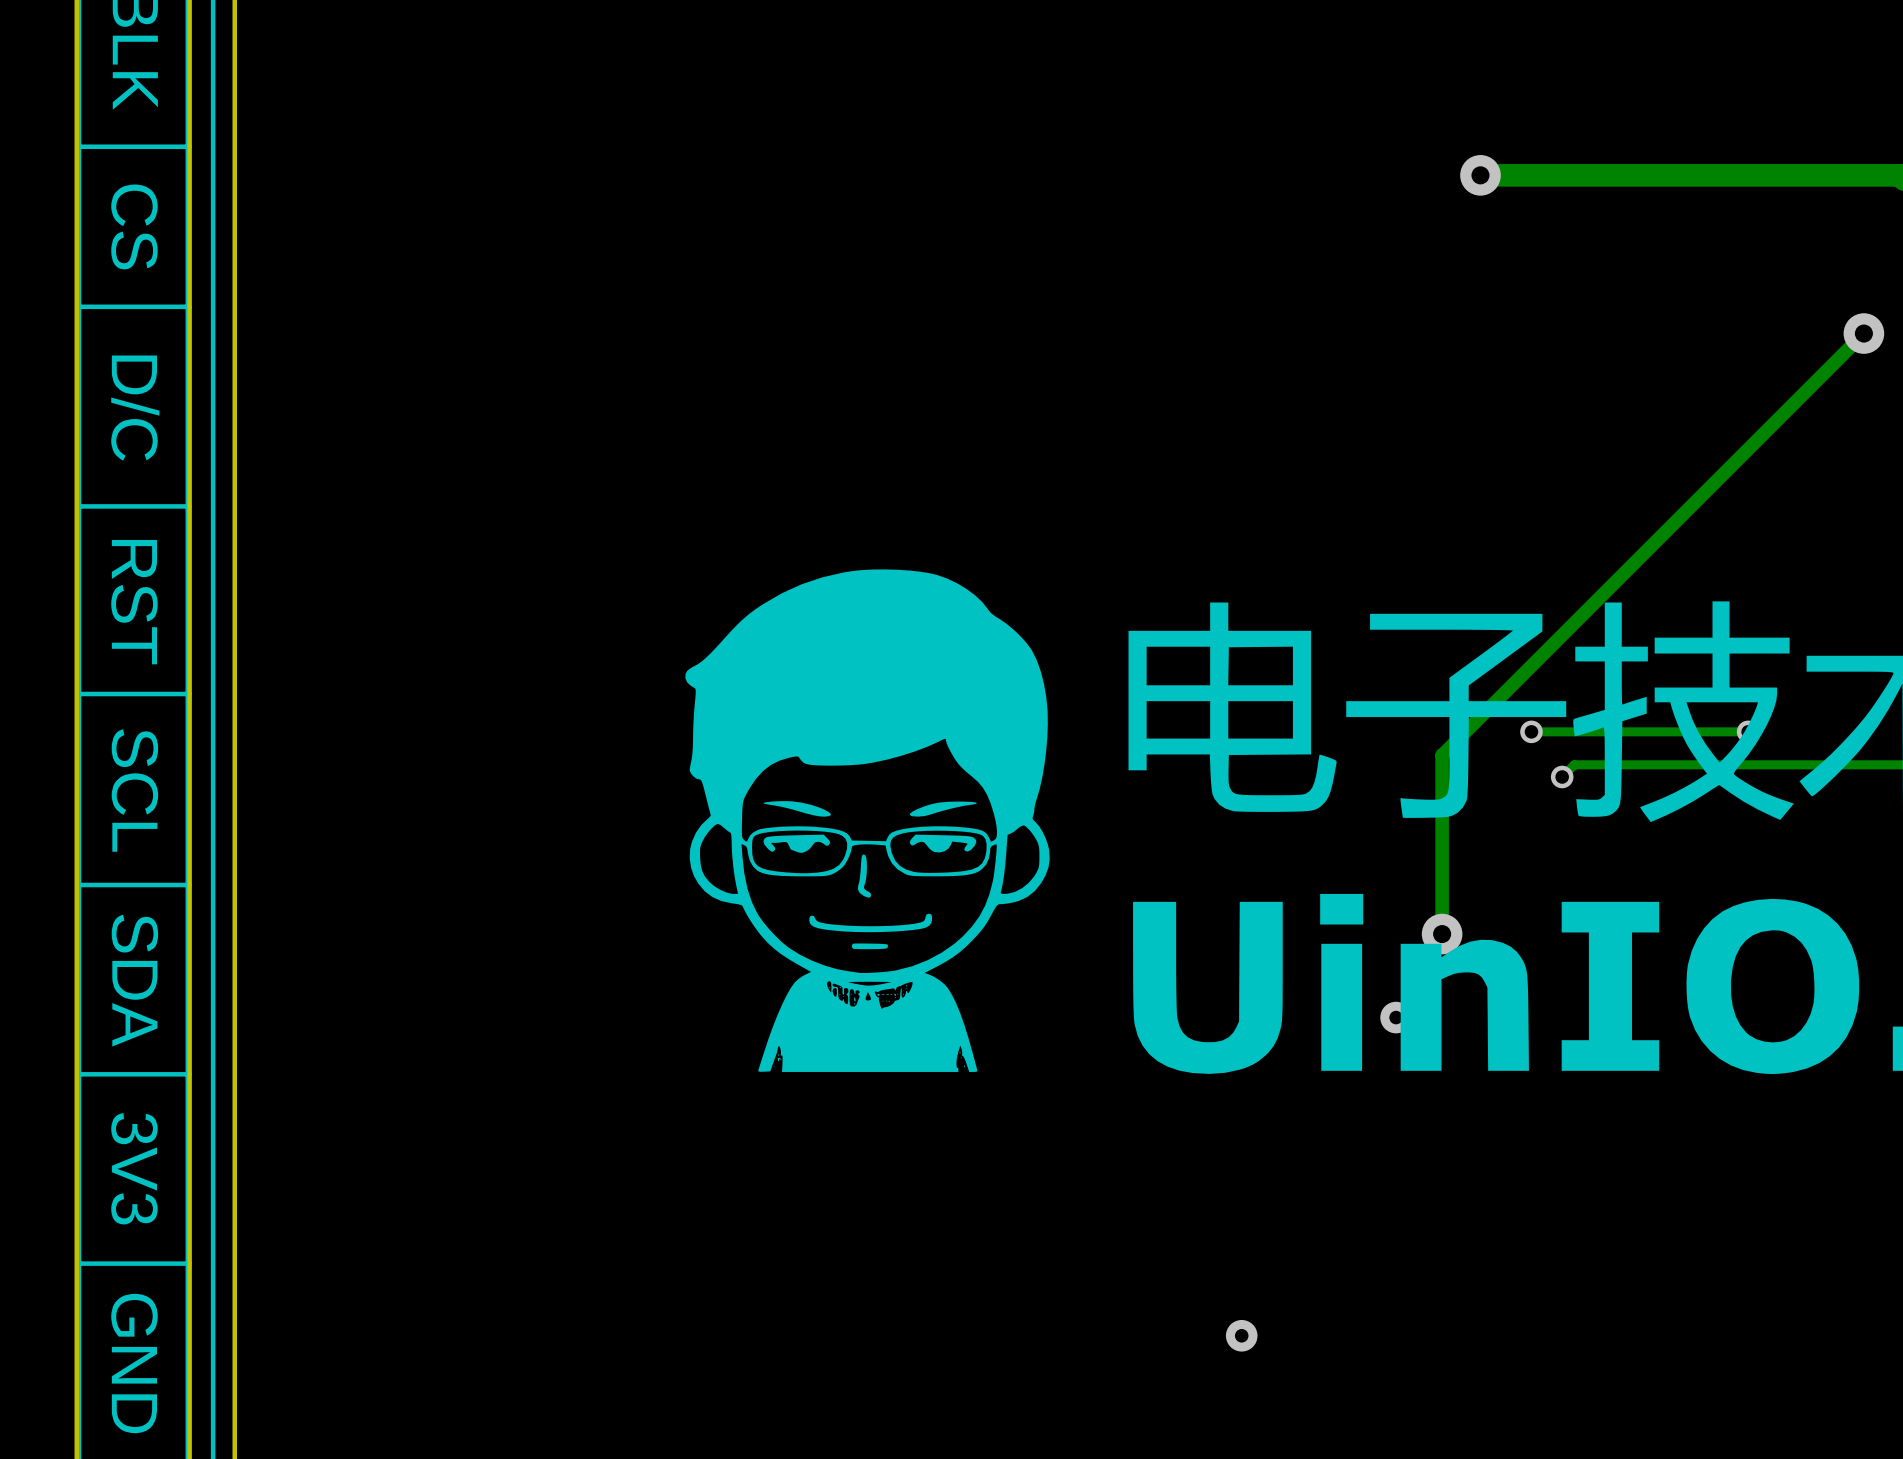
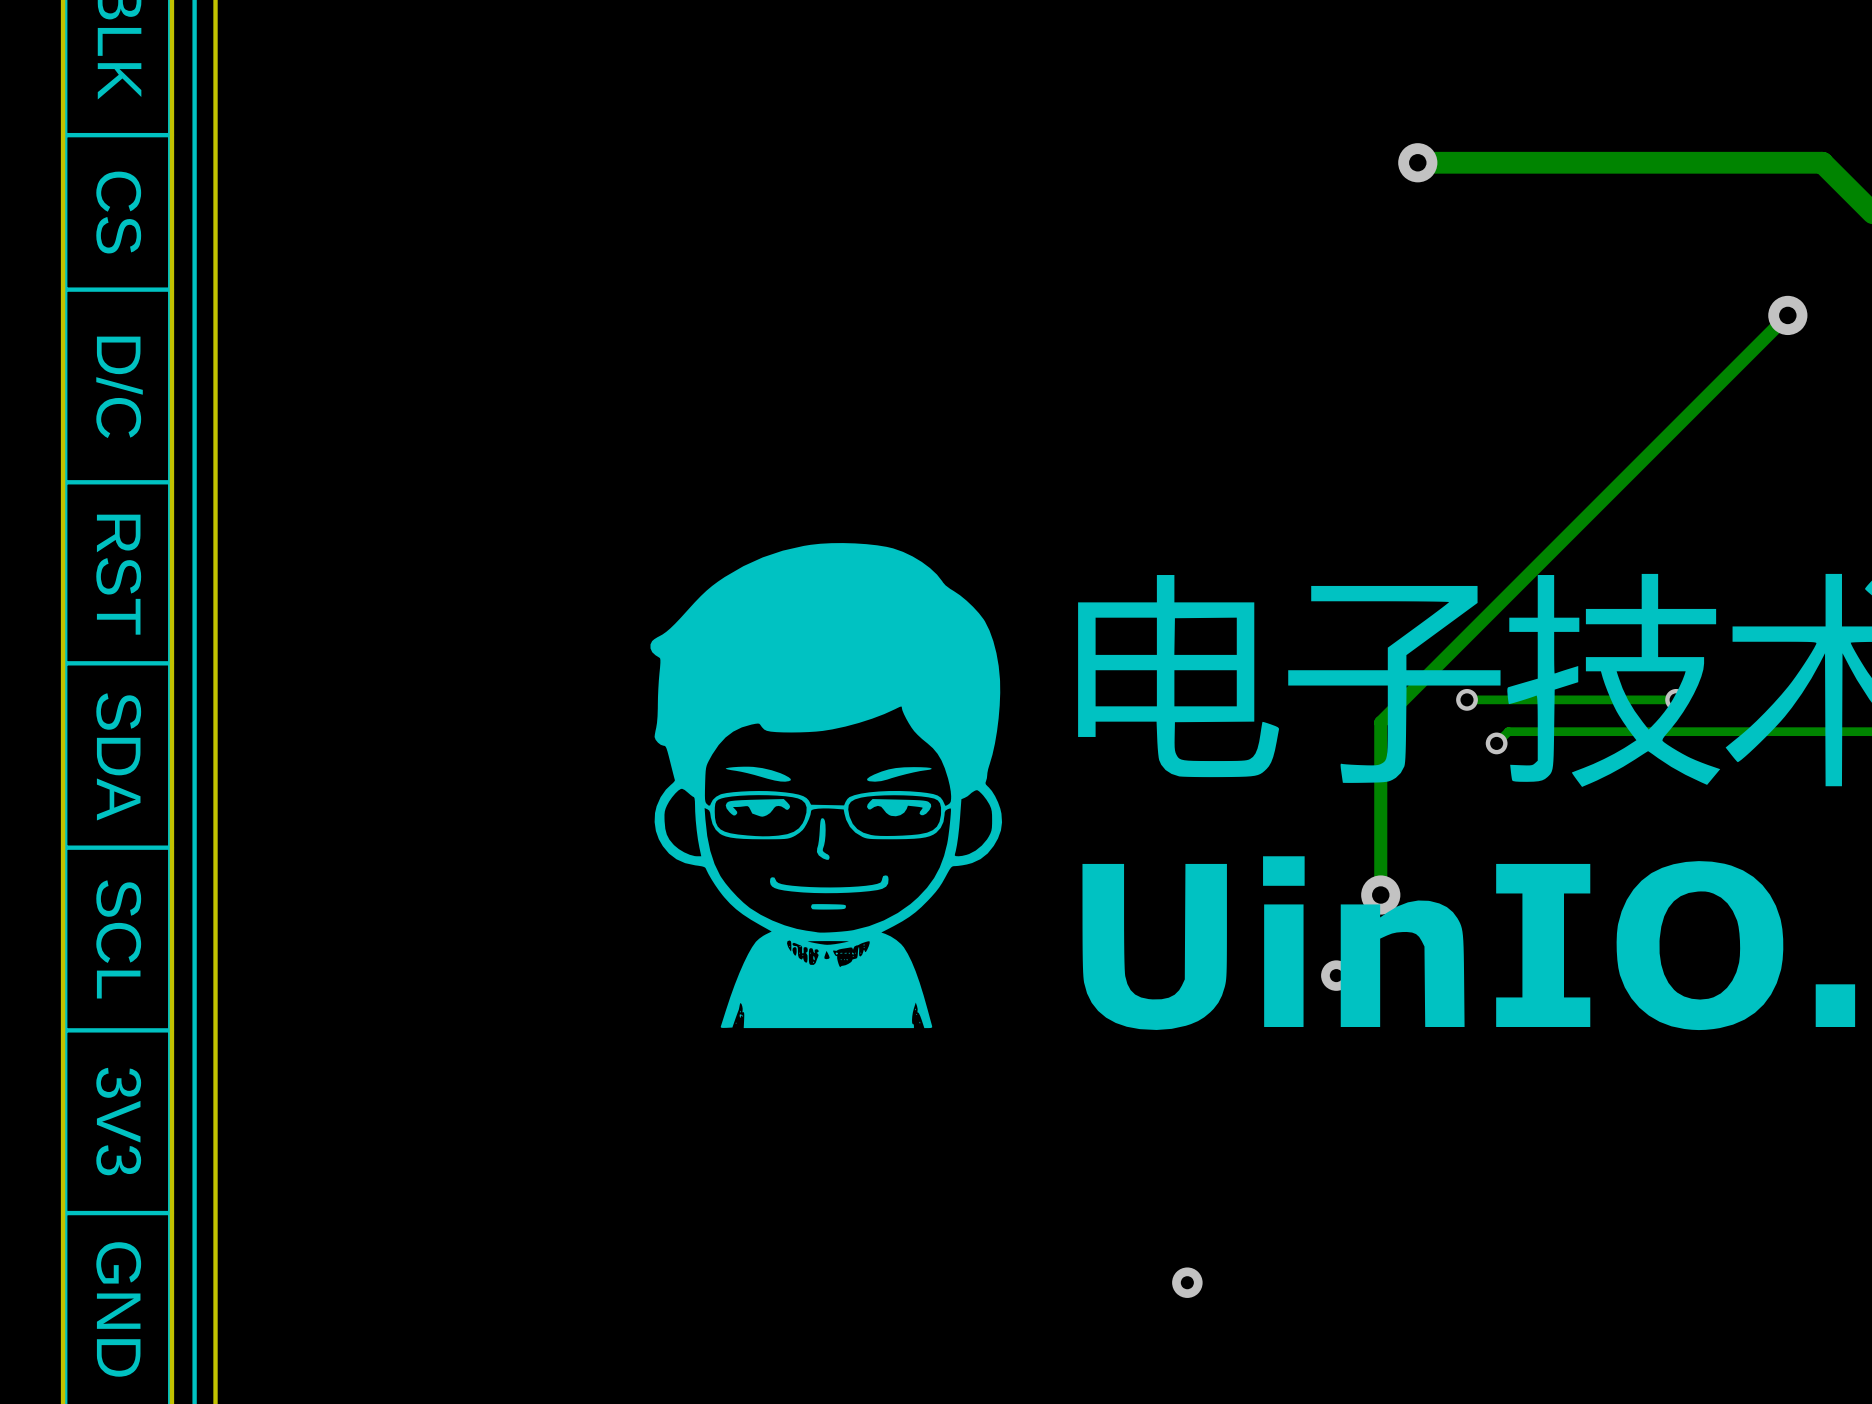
text: SCL (134, 790) -> SDA (118, 756)
text: SDA (134, 980) -> SCL (118, 939)

